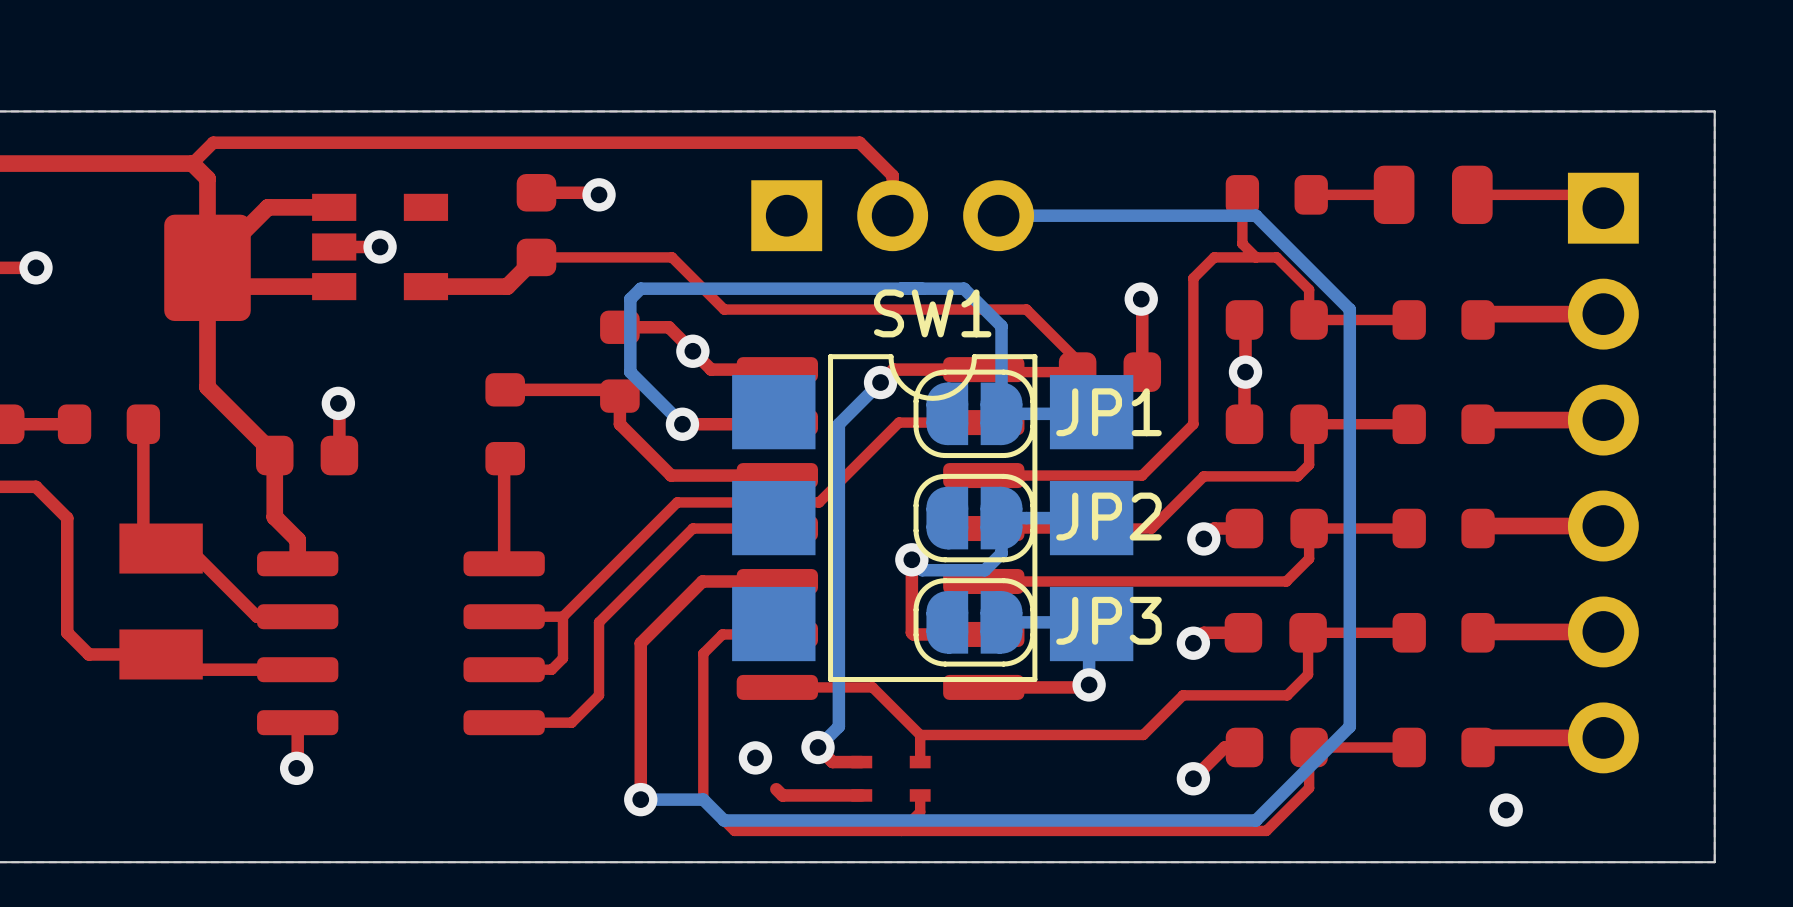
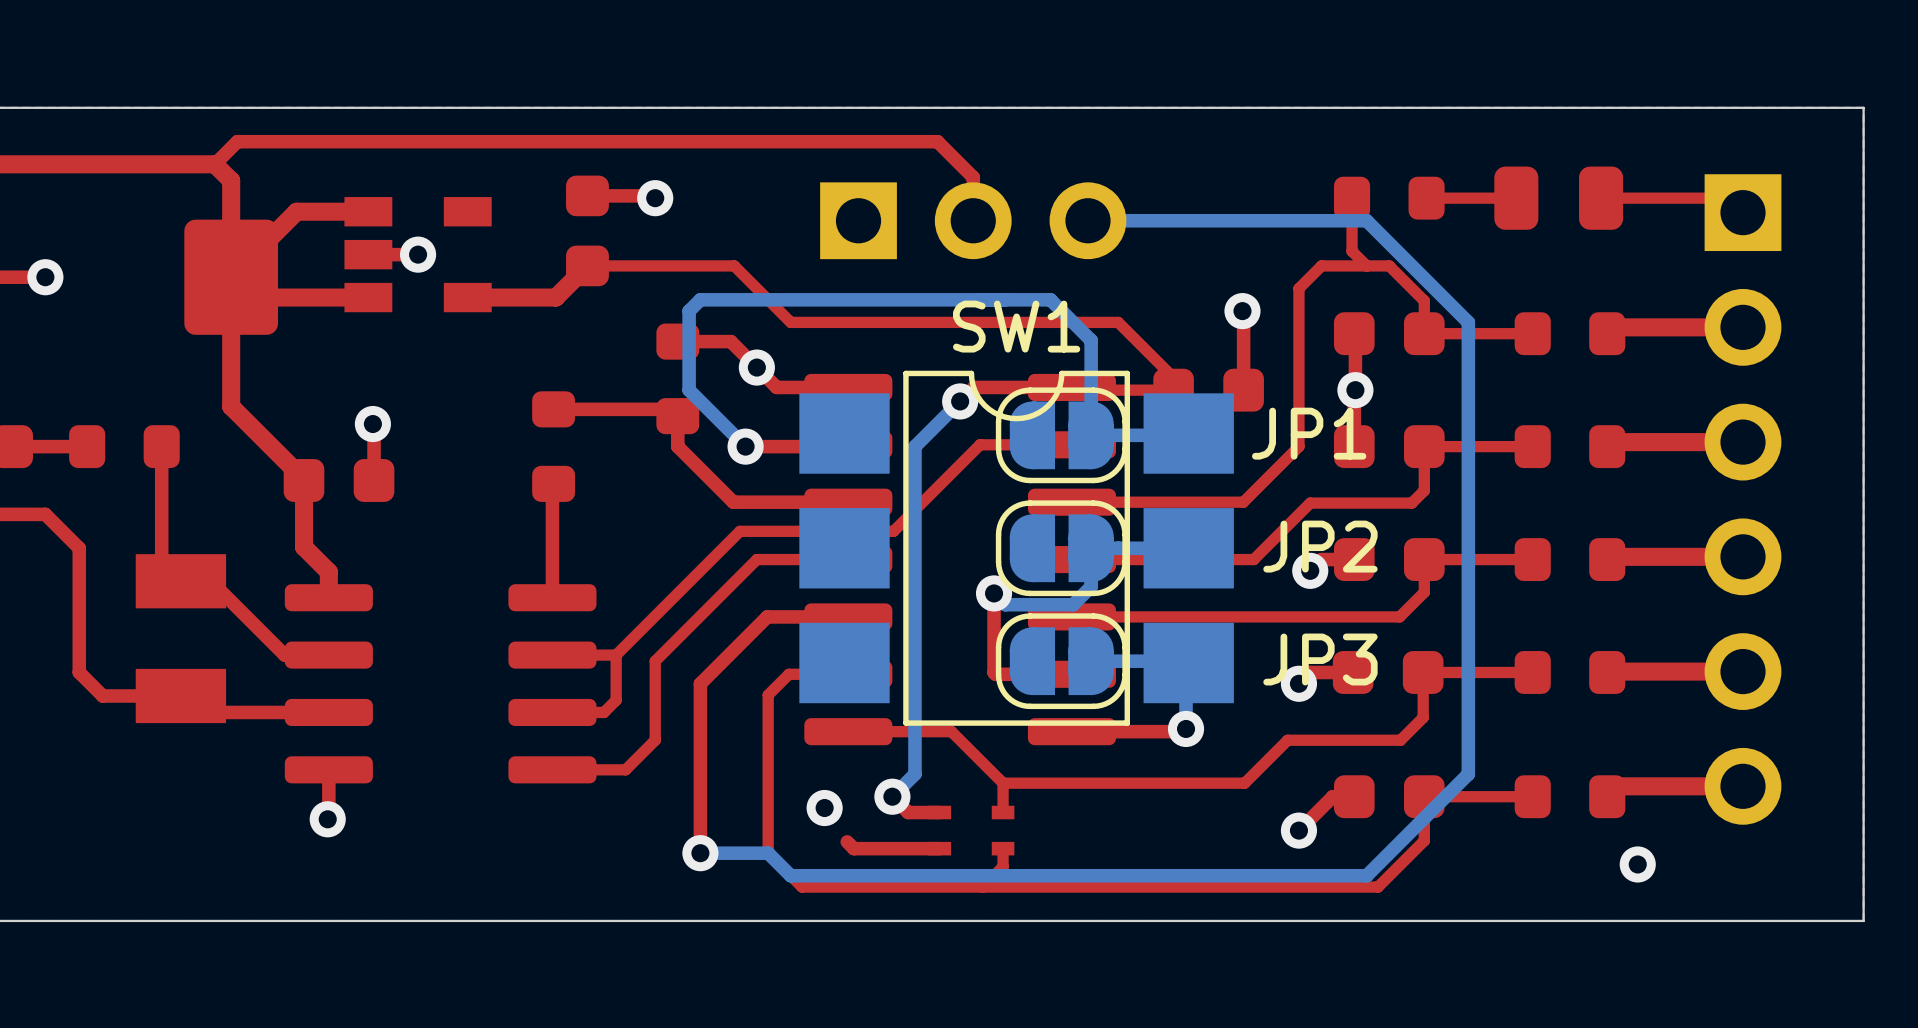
JP1 name position: JP1 (1108, 412) -> JP1 (1309, 433)
JP2 name position: JP2 (1108, 516) -> JP2 (1320, 546)
JP3 name position: JP3 (1108, 620) -> JP3 (1320, 659)

